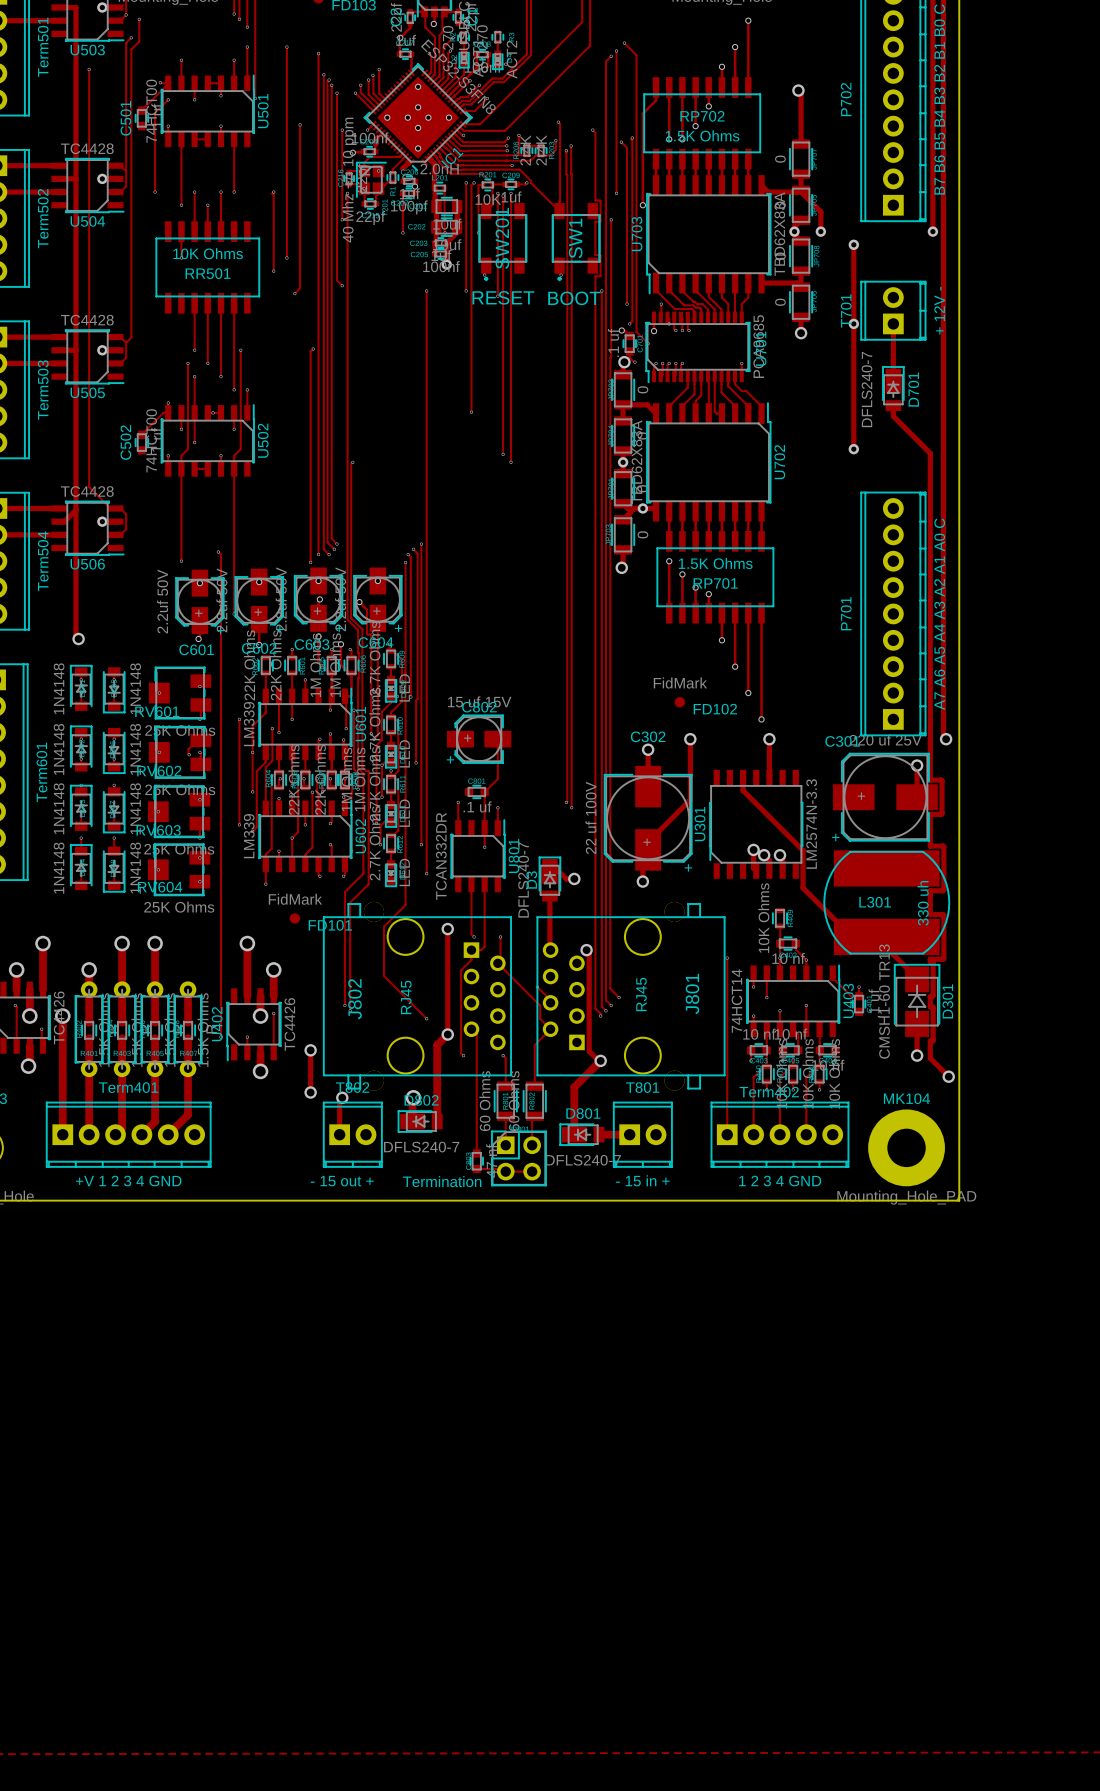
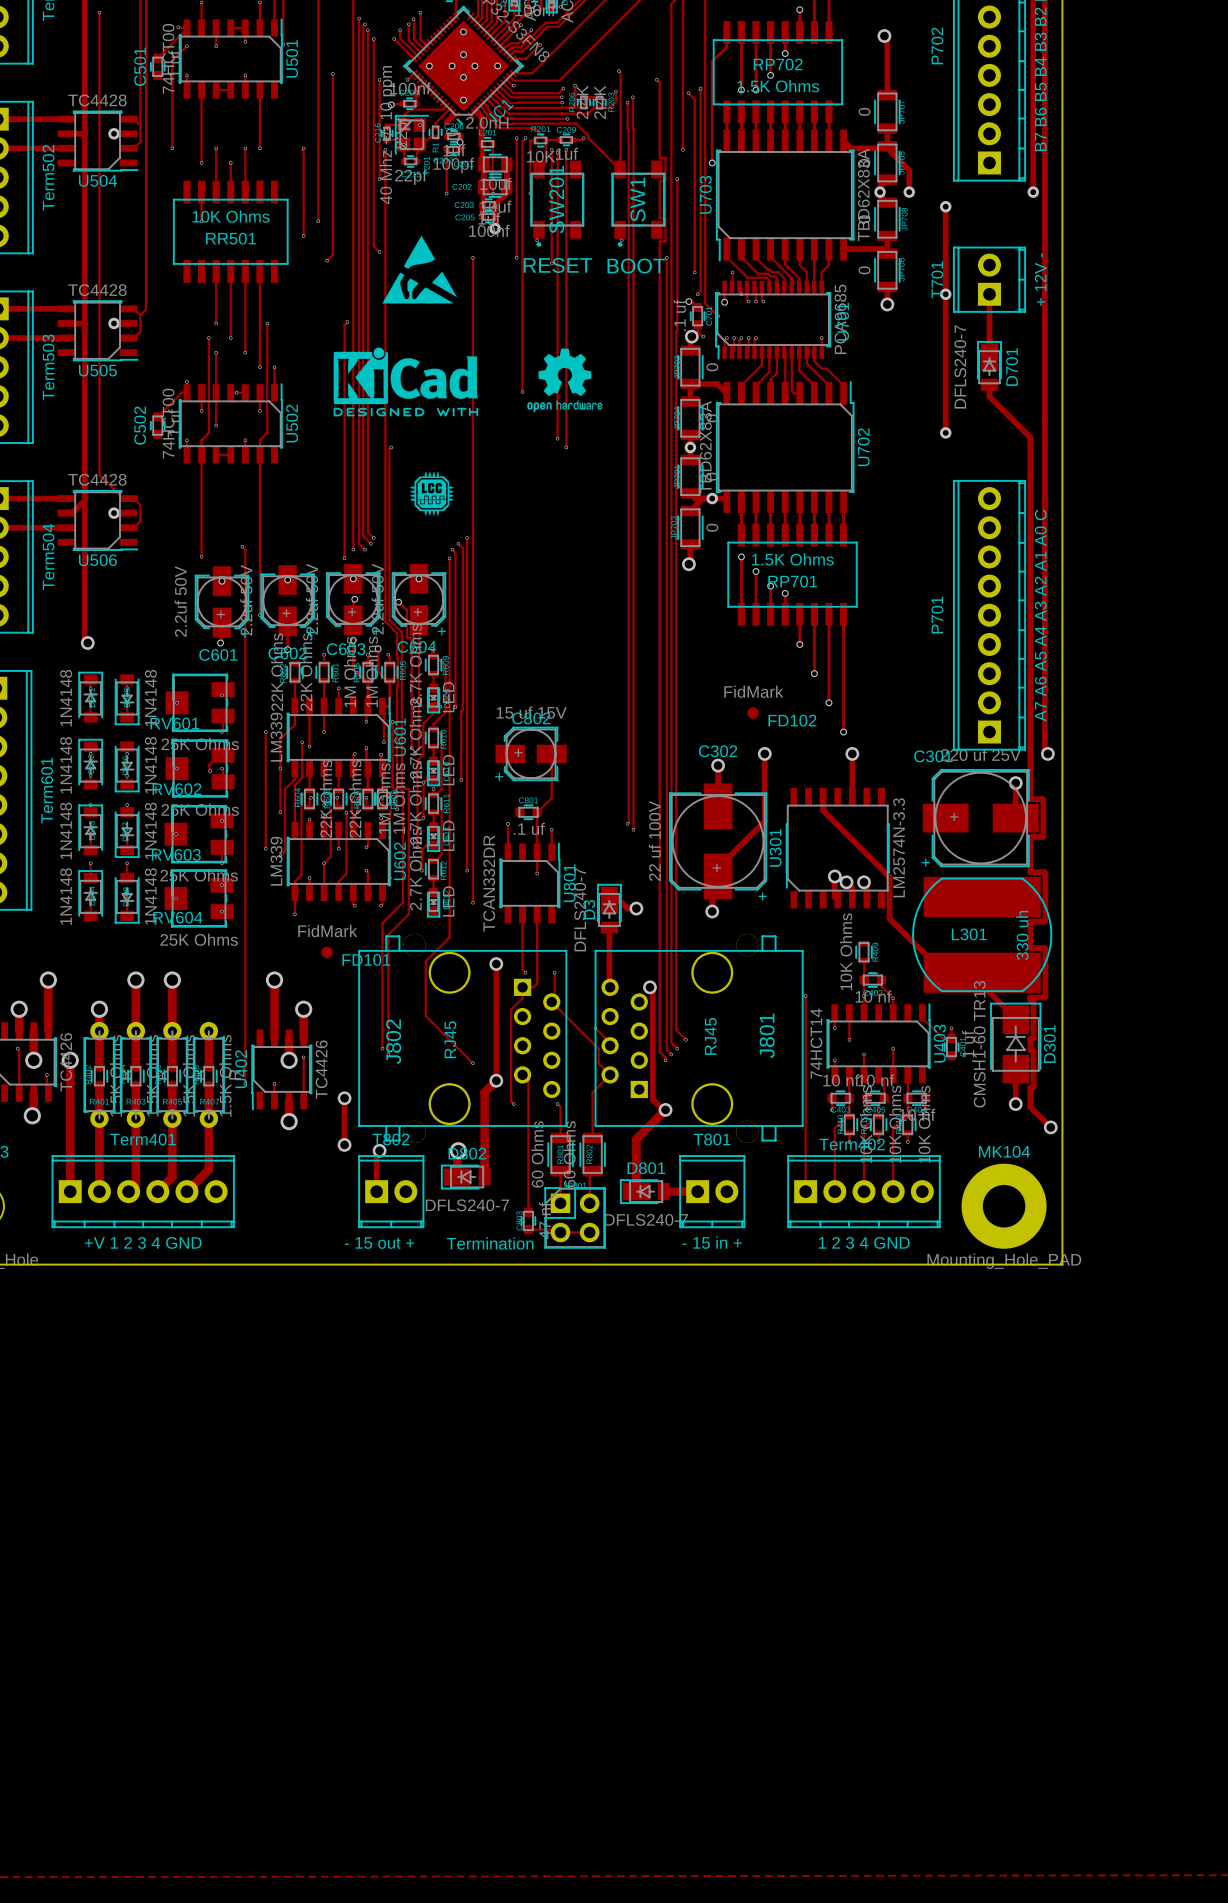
drawing: none -> [382, 235, 457, 304]
drawing: none -> [333, 347, 479, 417]
drawing: none -> [527, 348, 603, 413]
drawing: none -> [410, 471, 454, 516]

